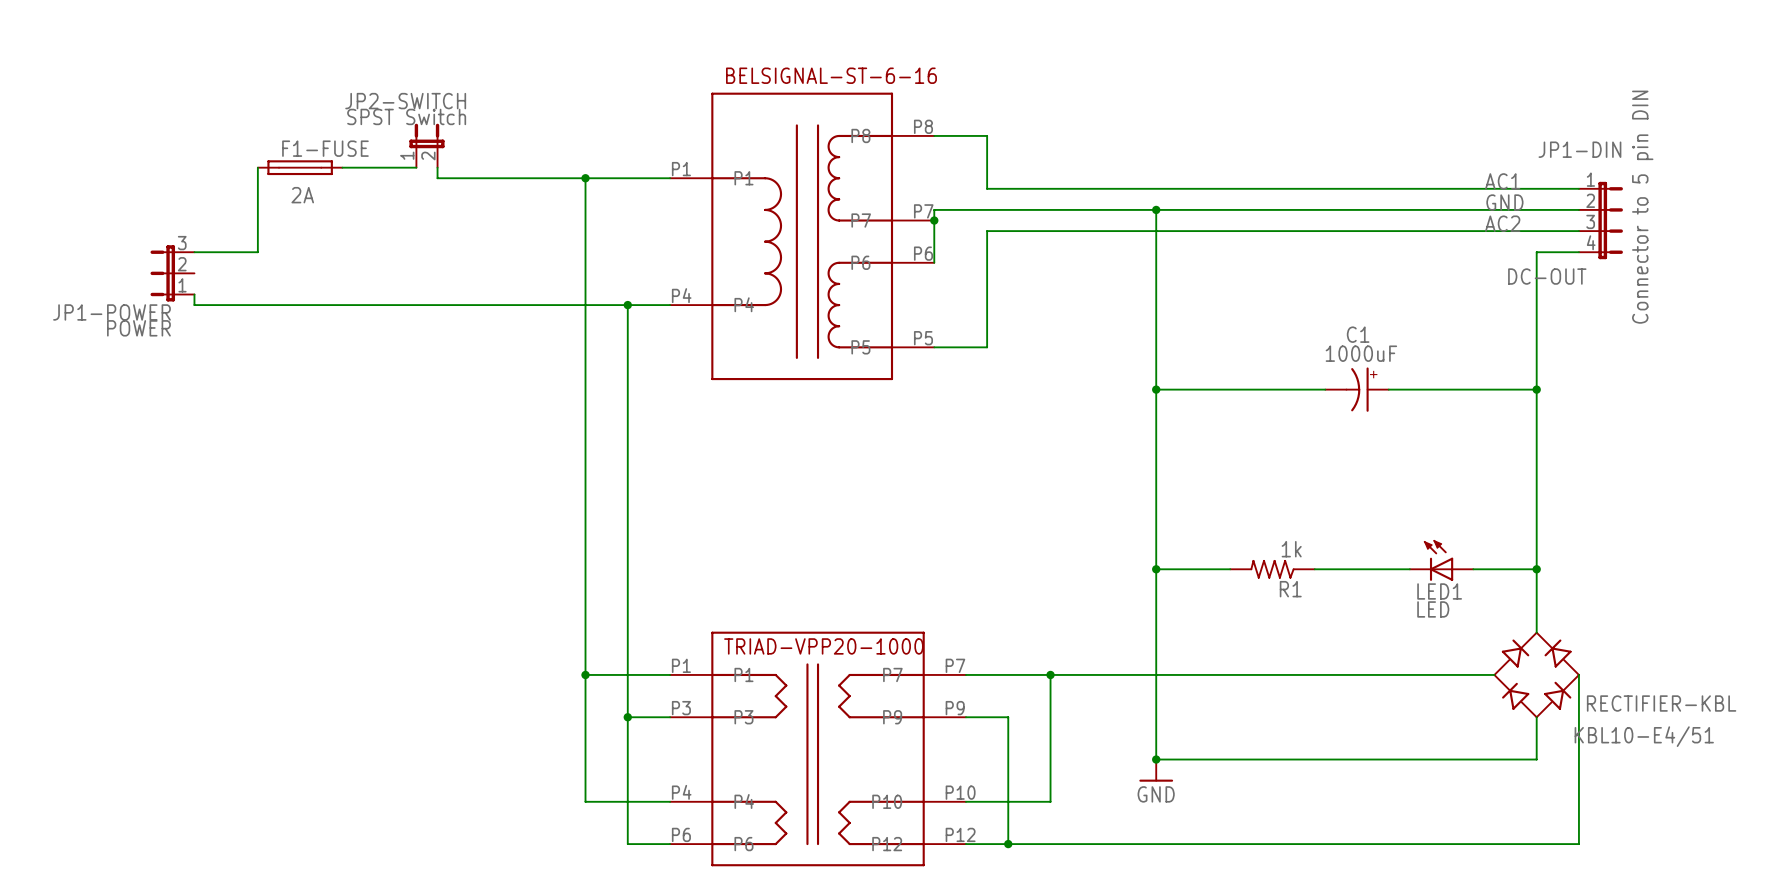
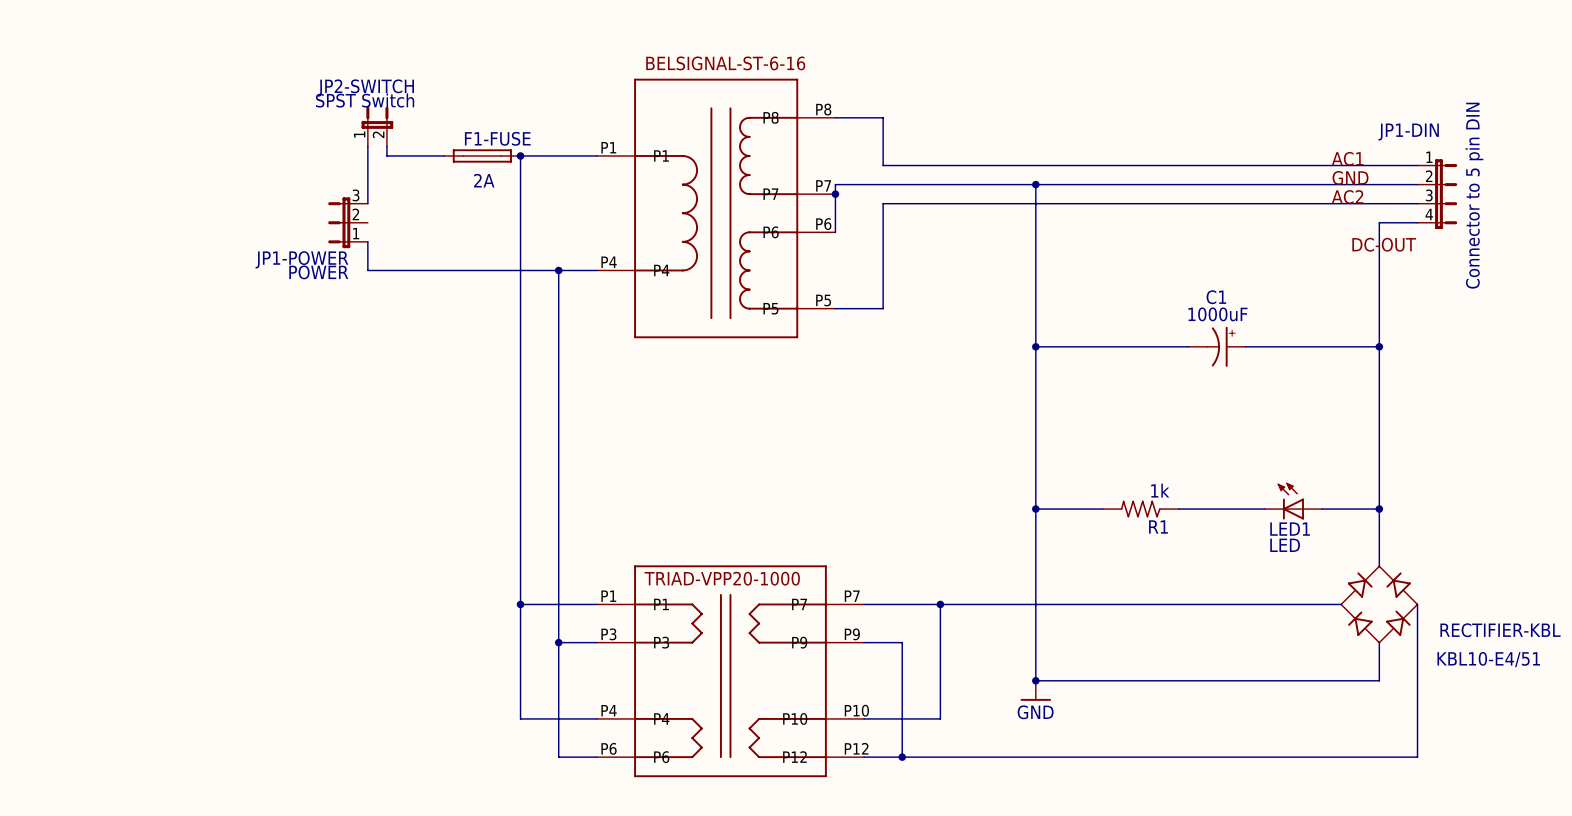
wire: (257, 167) (257, 252) (194, 252) -> none
F1-FUSE position: (300, 167) -> (482, 155)
wire: (342, 167) (416, 167) -> (367, 203) (367, 146)
JP1-POWER position: (172, 273) -> (348, 222)
wire: (194, 294) (194, 305) (416, 305) -> (367, 241) (367, 270)

